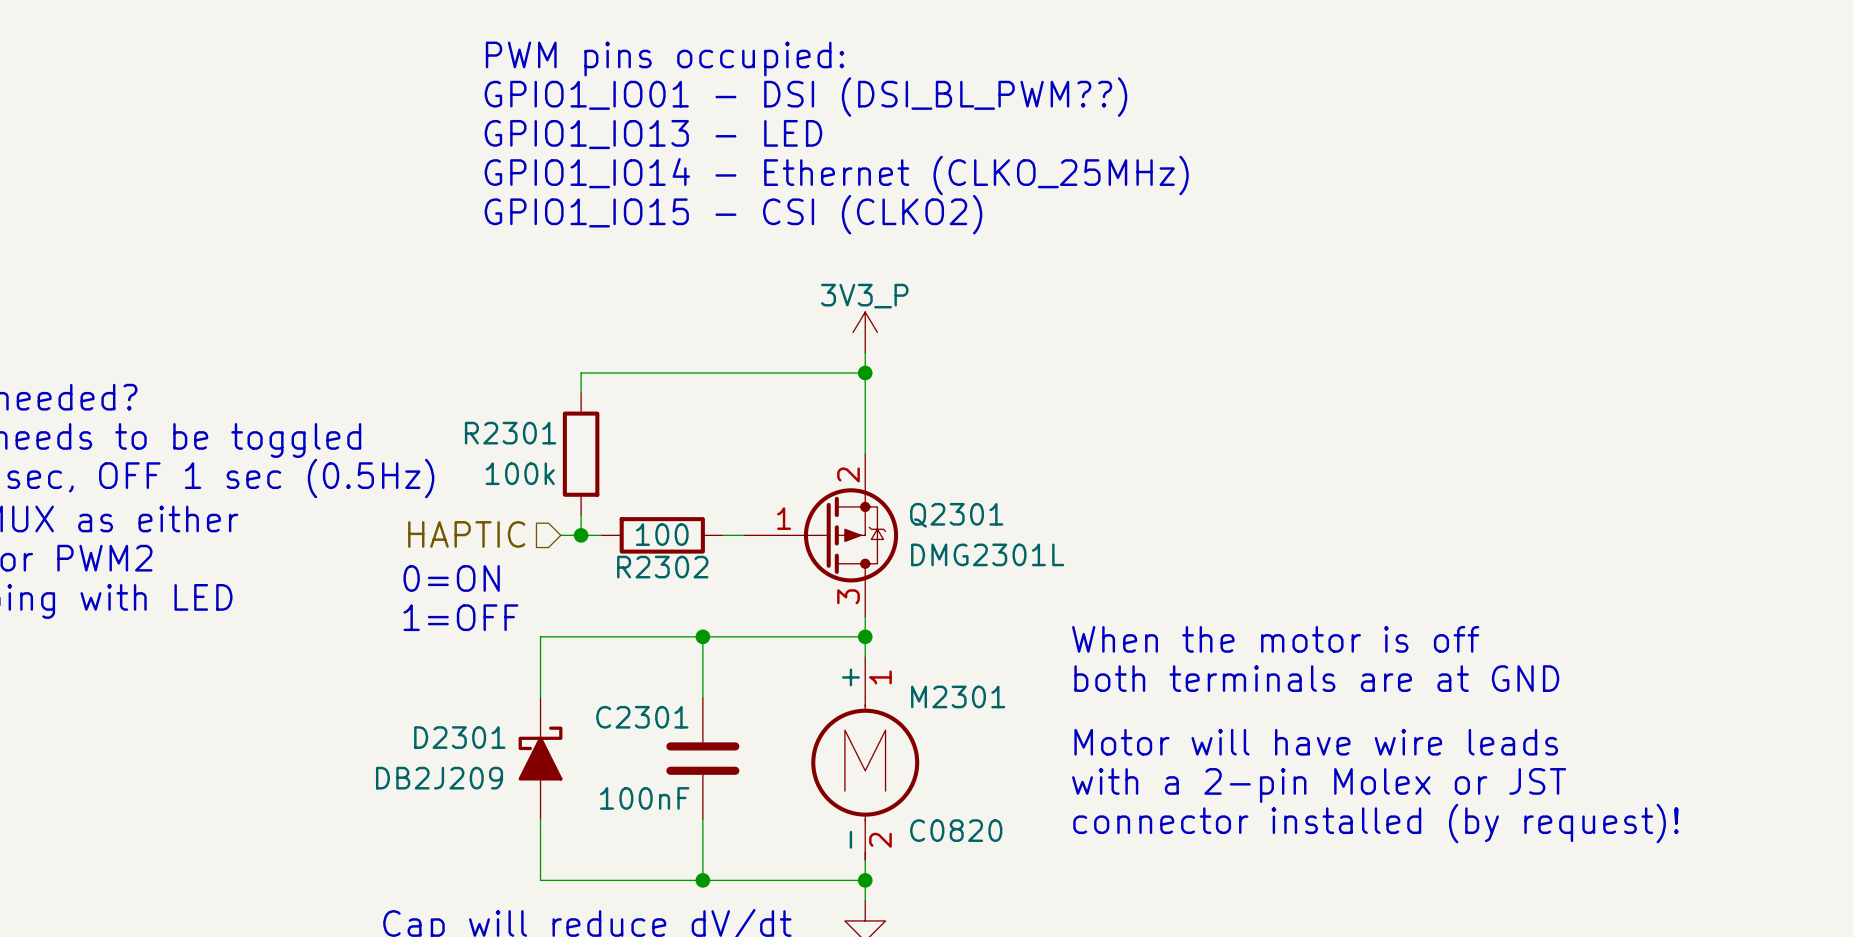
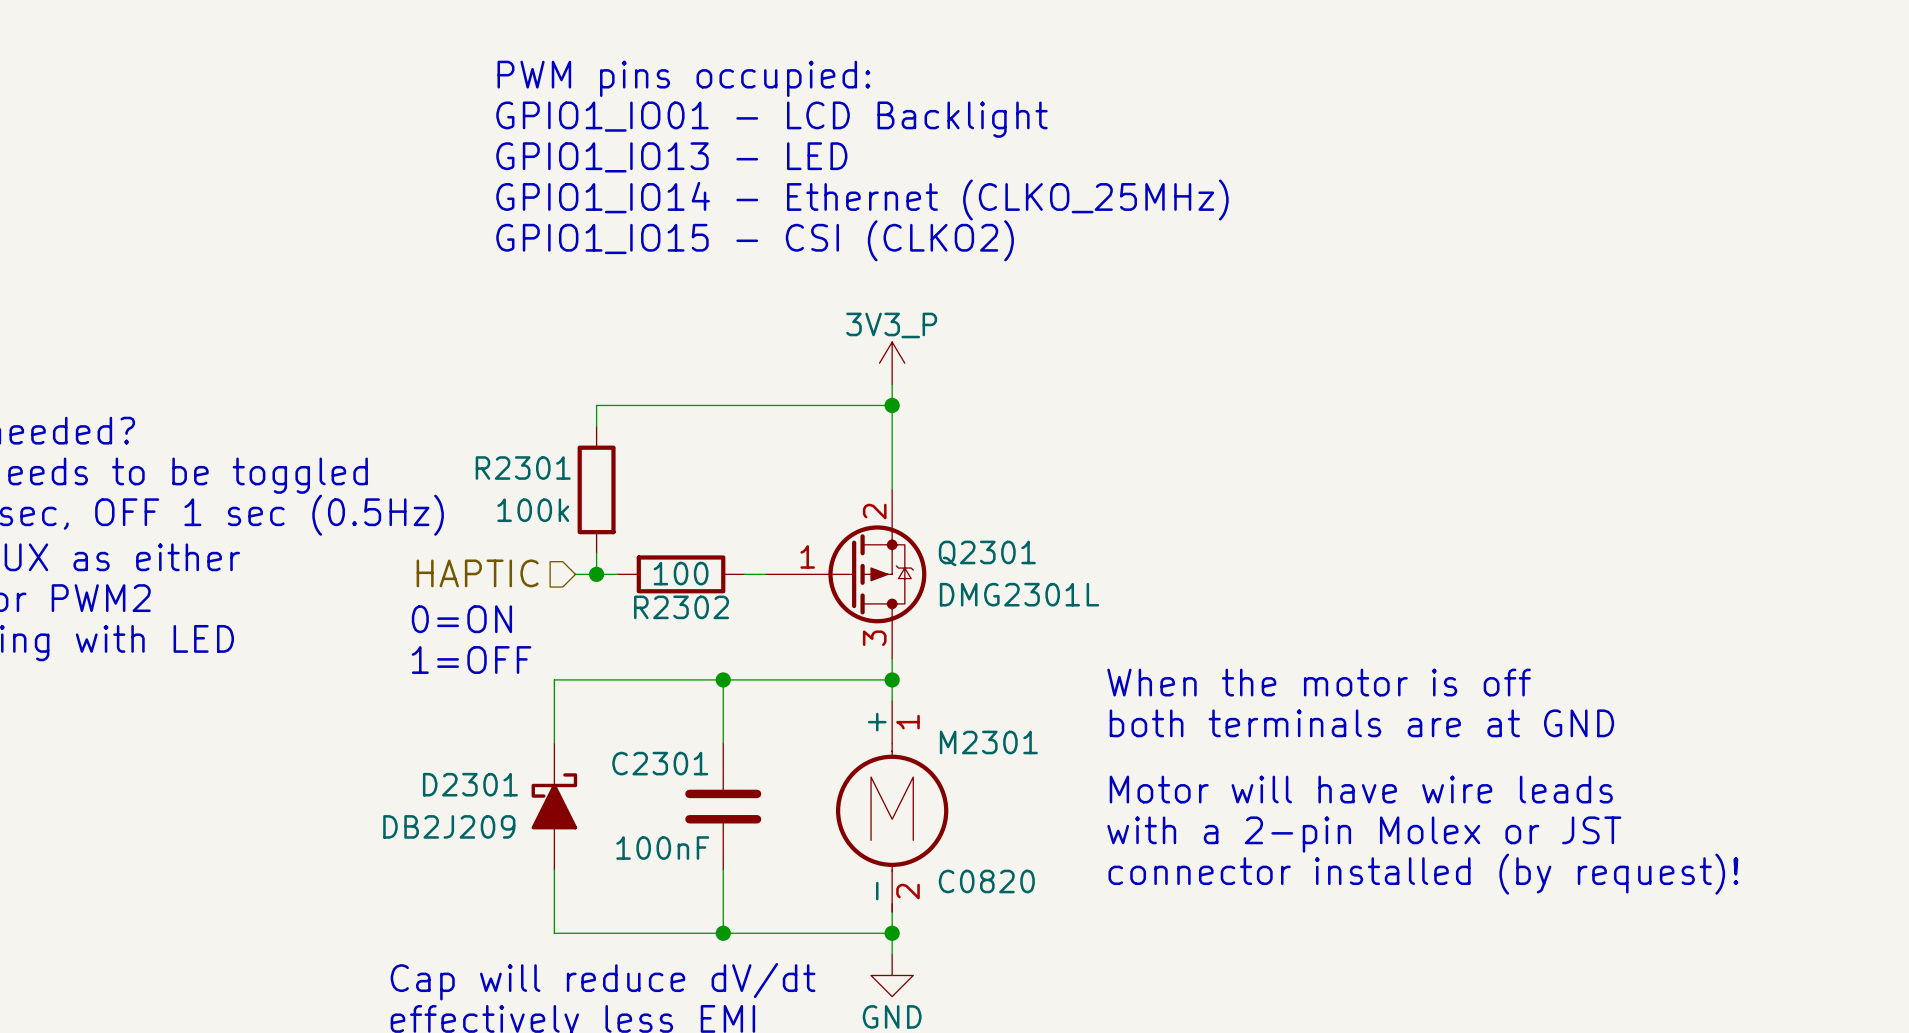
text: GPIO1_IO01 - DSI (DSI_BL_PWM??) (805, 97) -> GPIO1_IO01 - LCD Backlight (771, 119)

